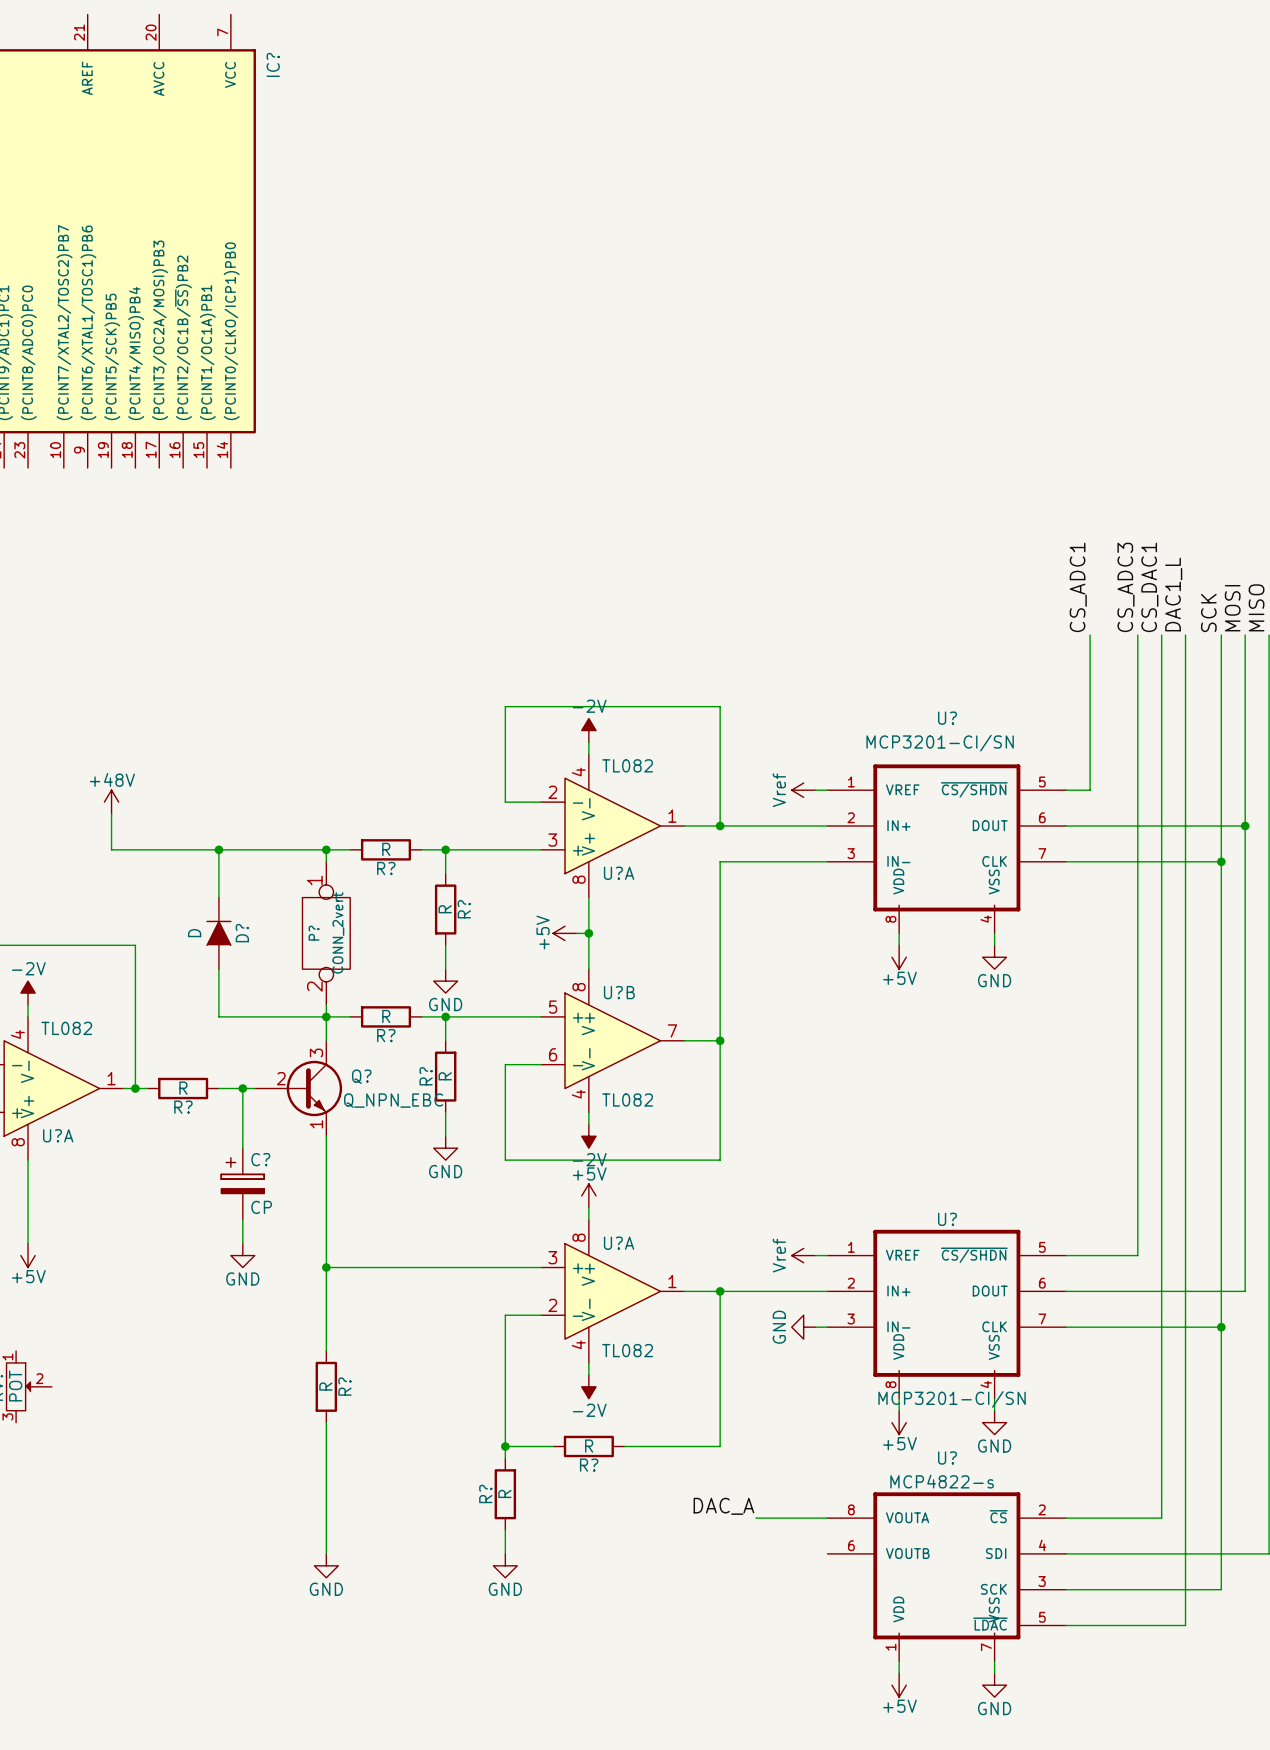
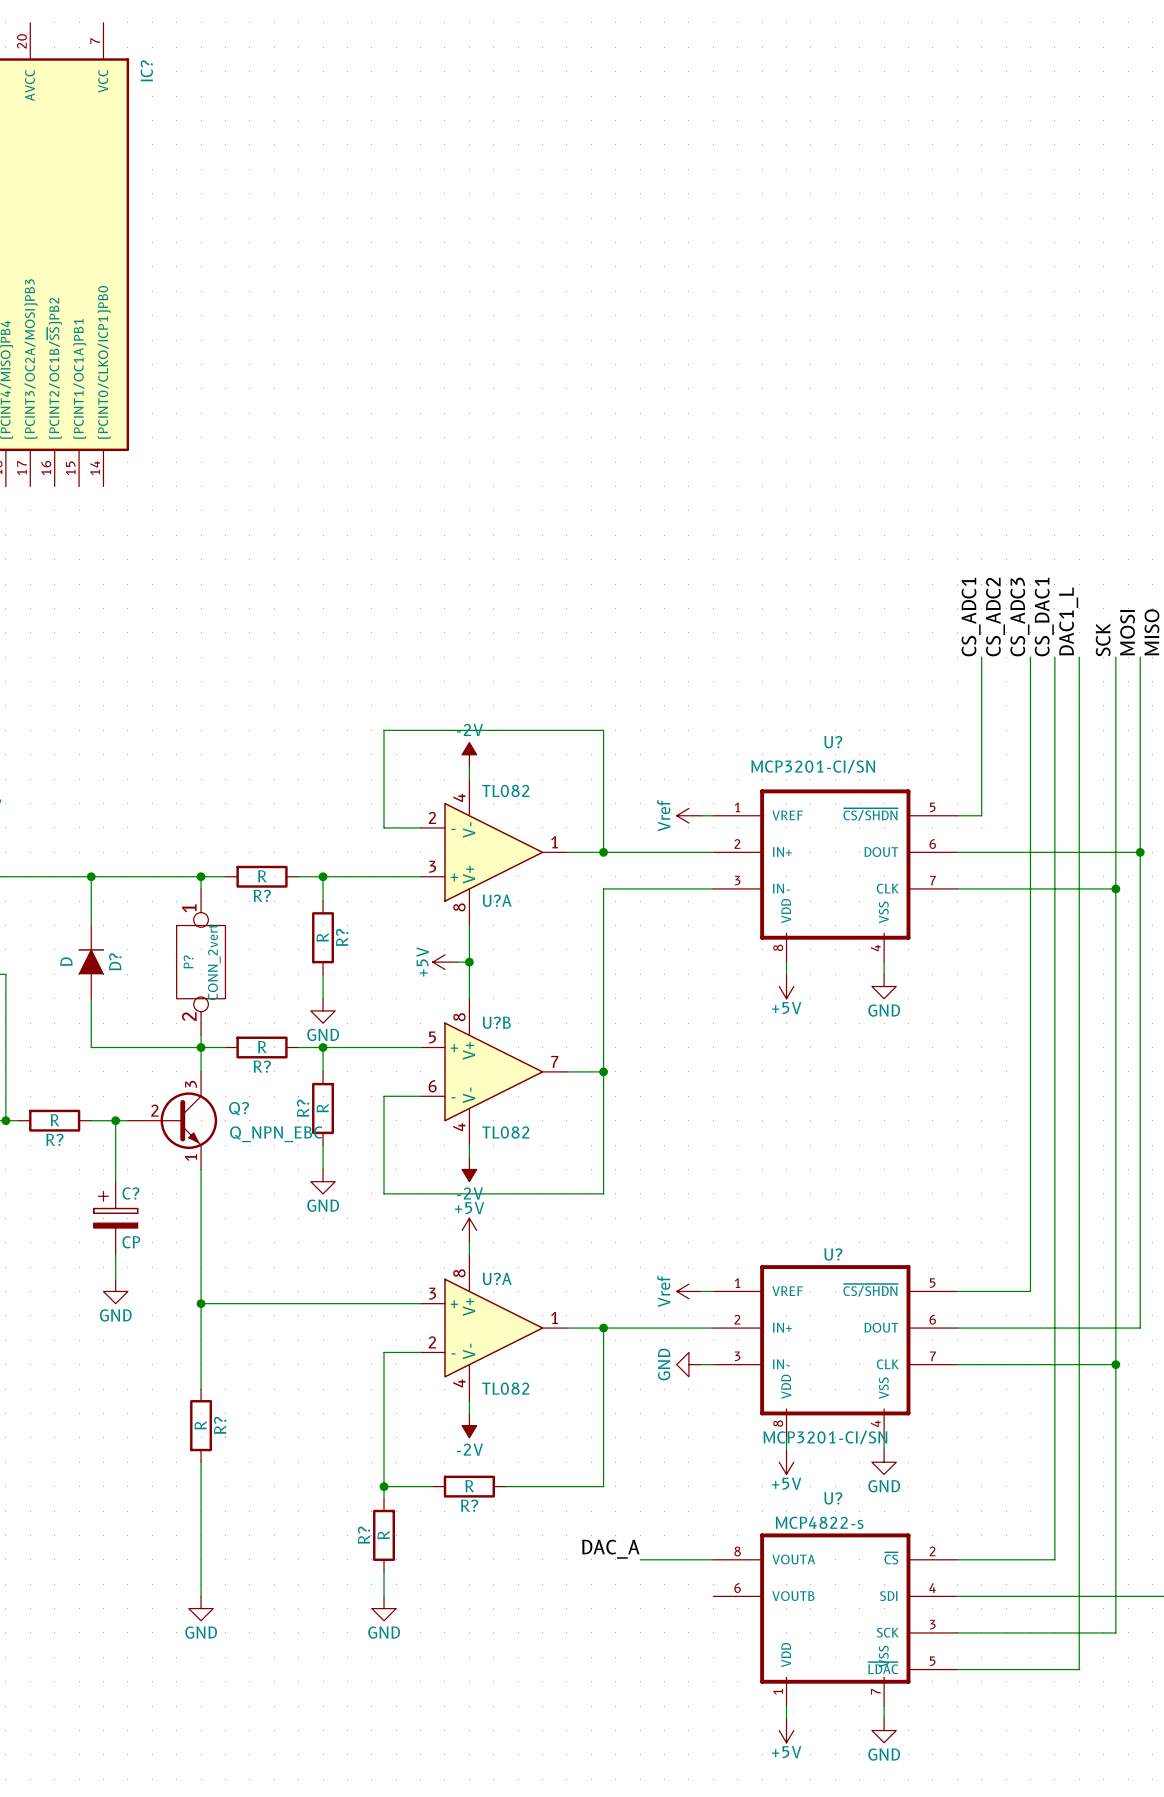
label: none -> CS_ADC2 (995, 617)

